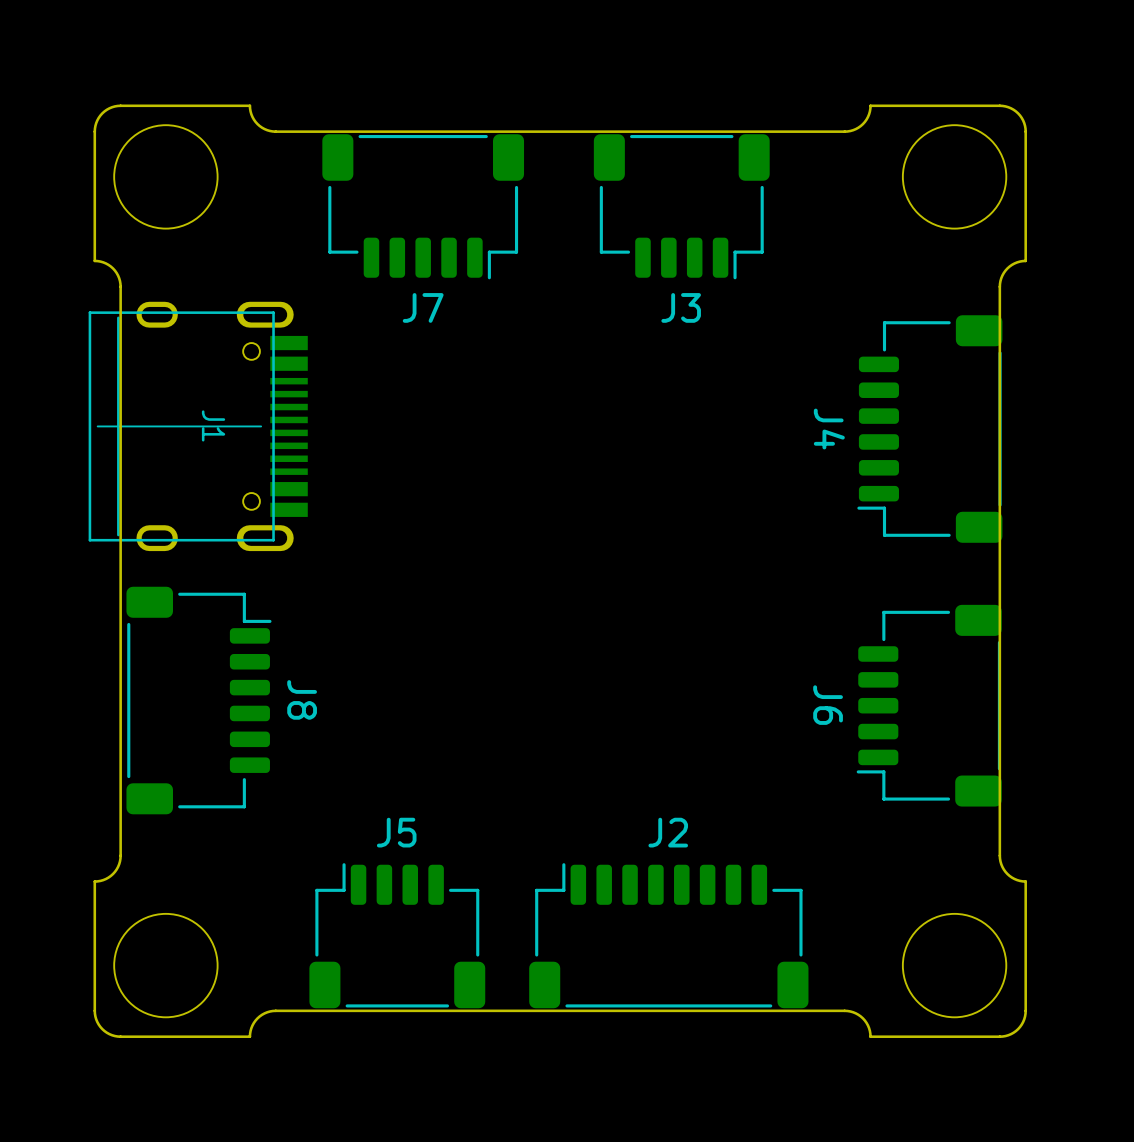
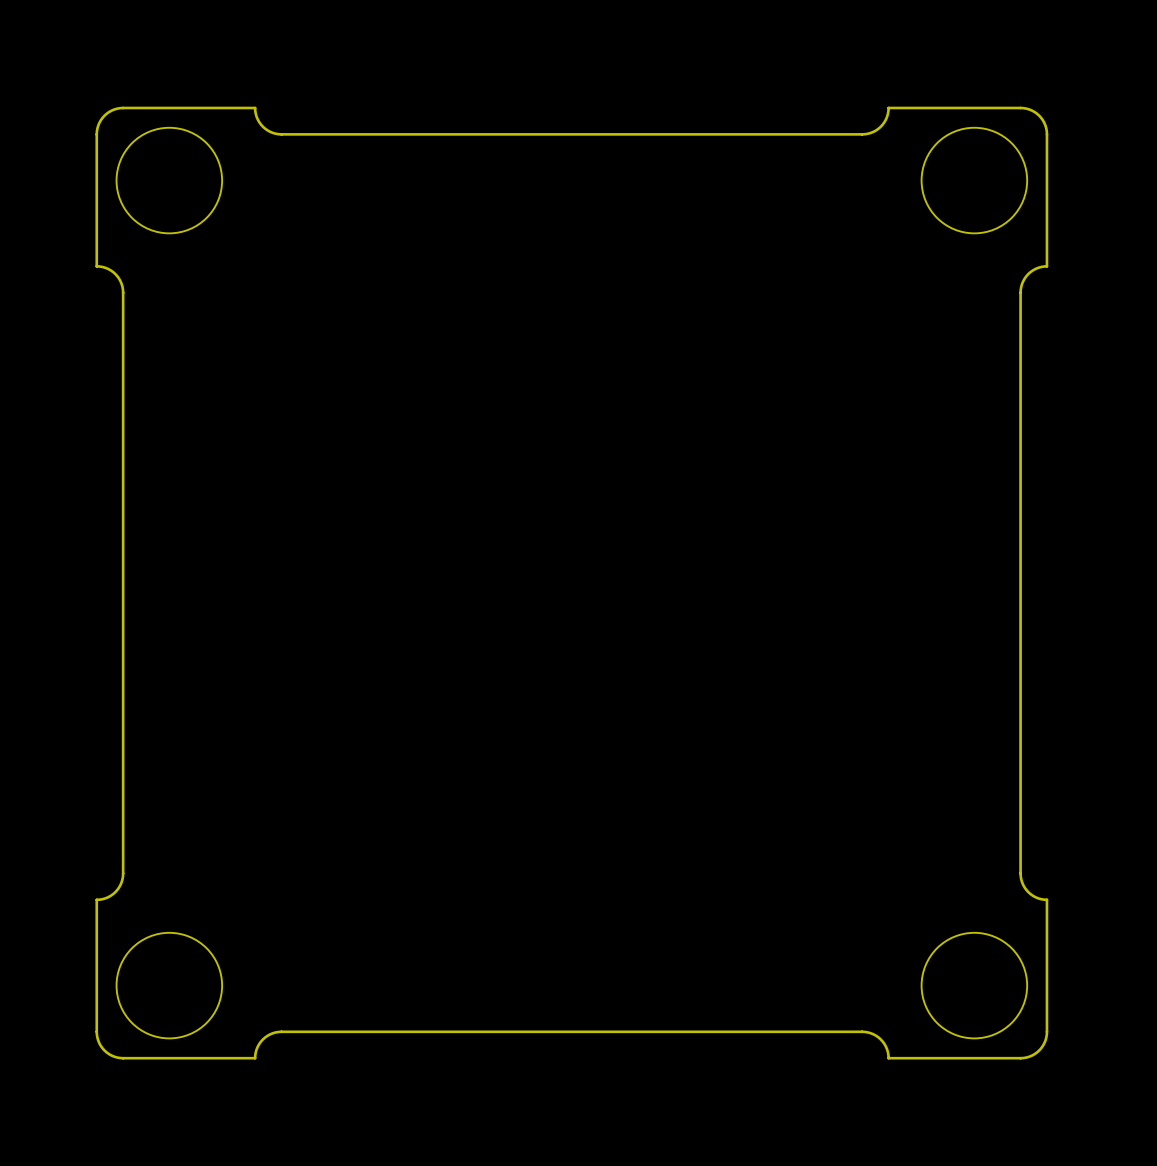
J7: (423, 206) -> none
J3: (681, 206) -> none
J1: (198, 426) -> none
J4: (929, 429) -> none
J8: (198, 700) -> none
J6: (929, 705) -> none
J5: (397, 935) -> none
J2: (668, 935) -> none

